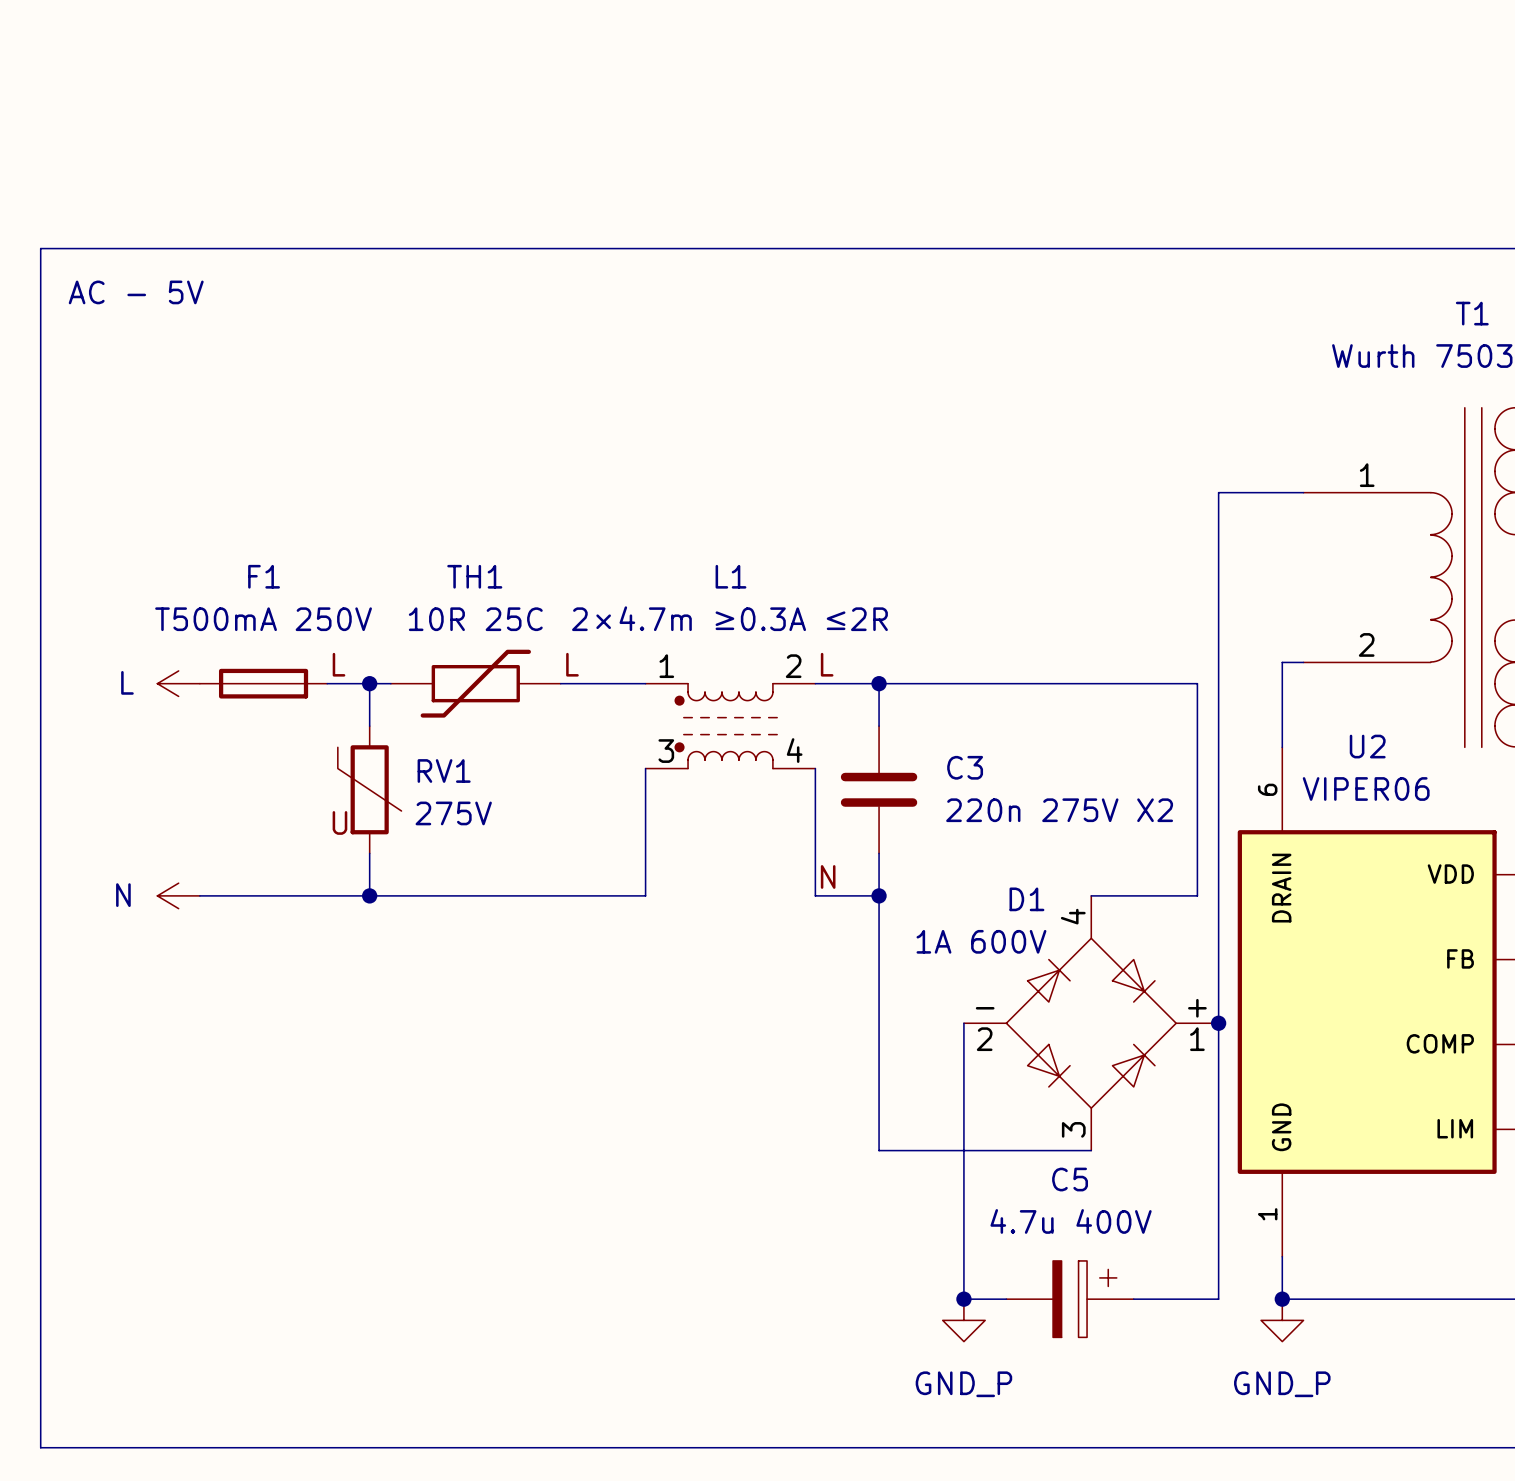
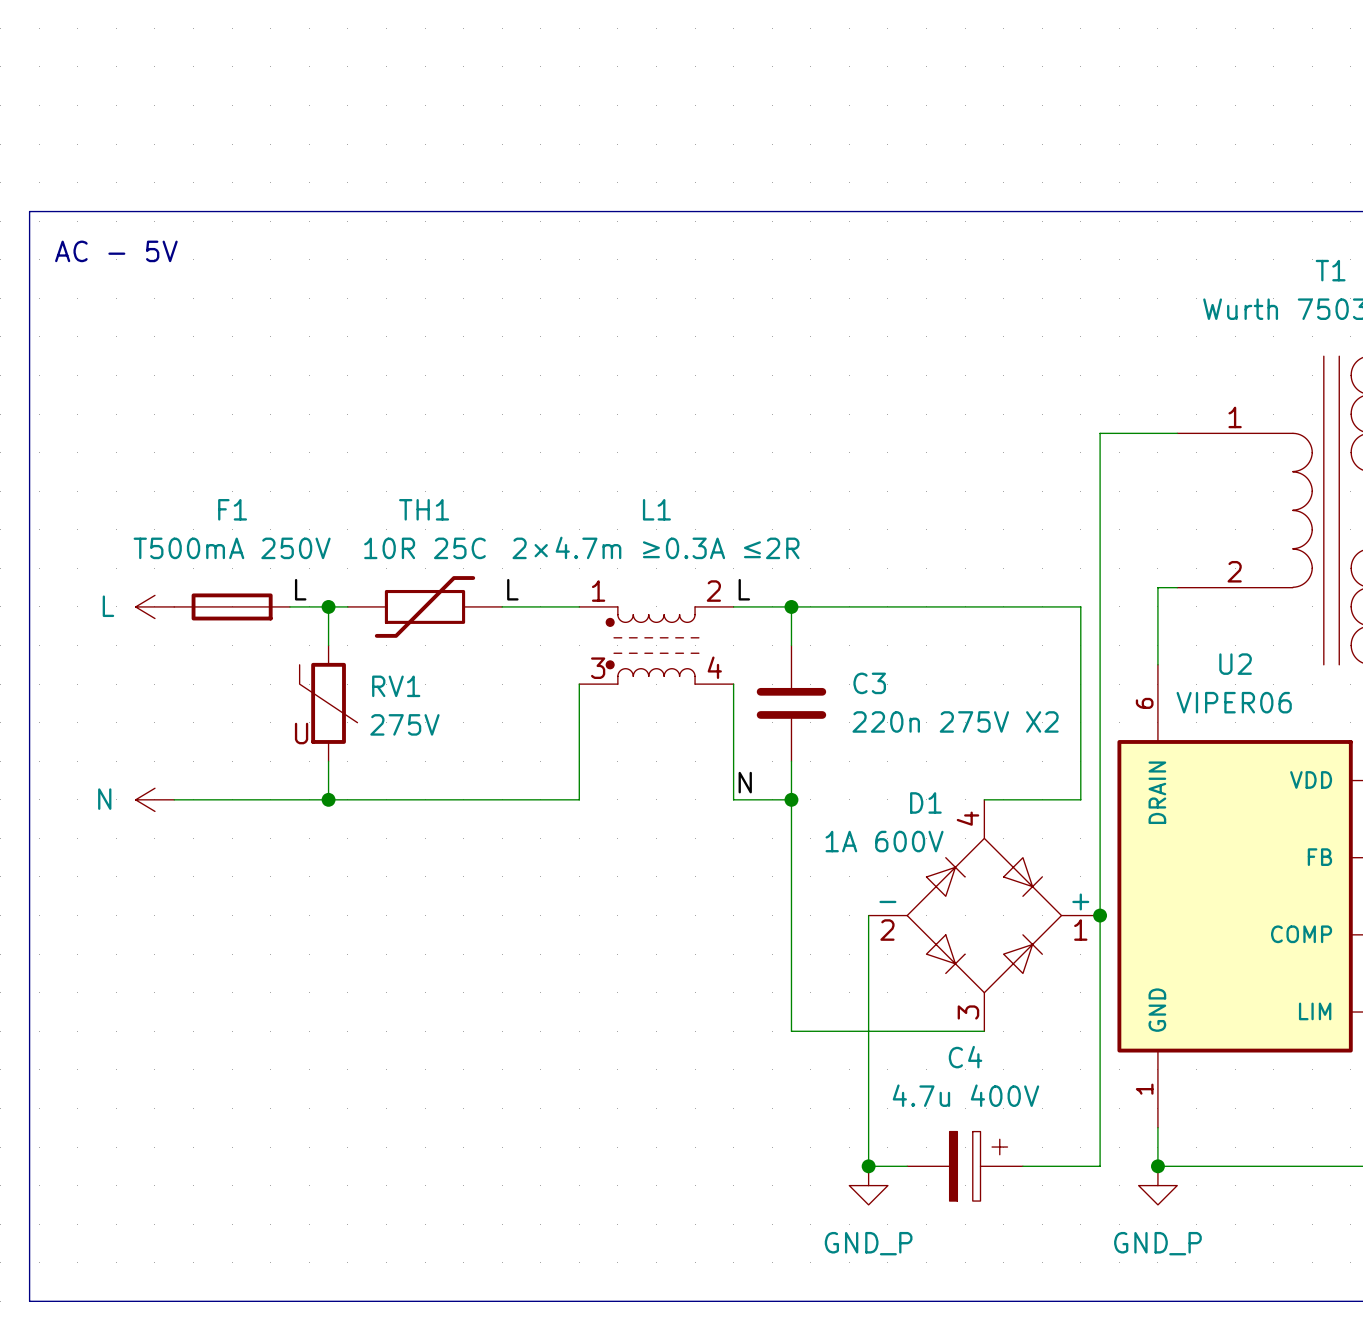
C5 name: C5 (1070, 1179) -> C4 (965, 1057)

